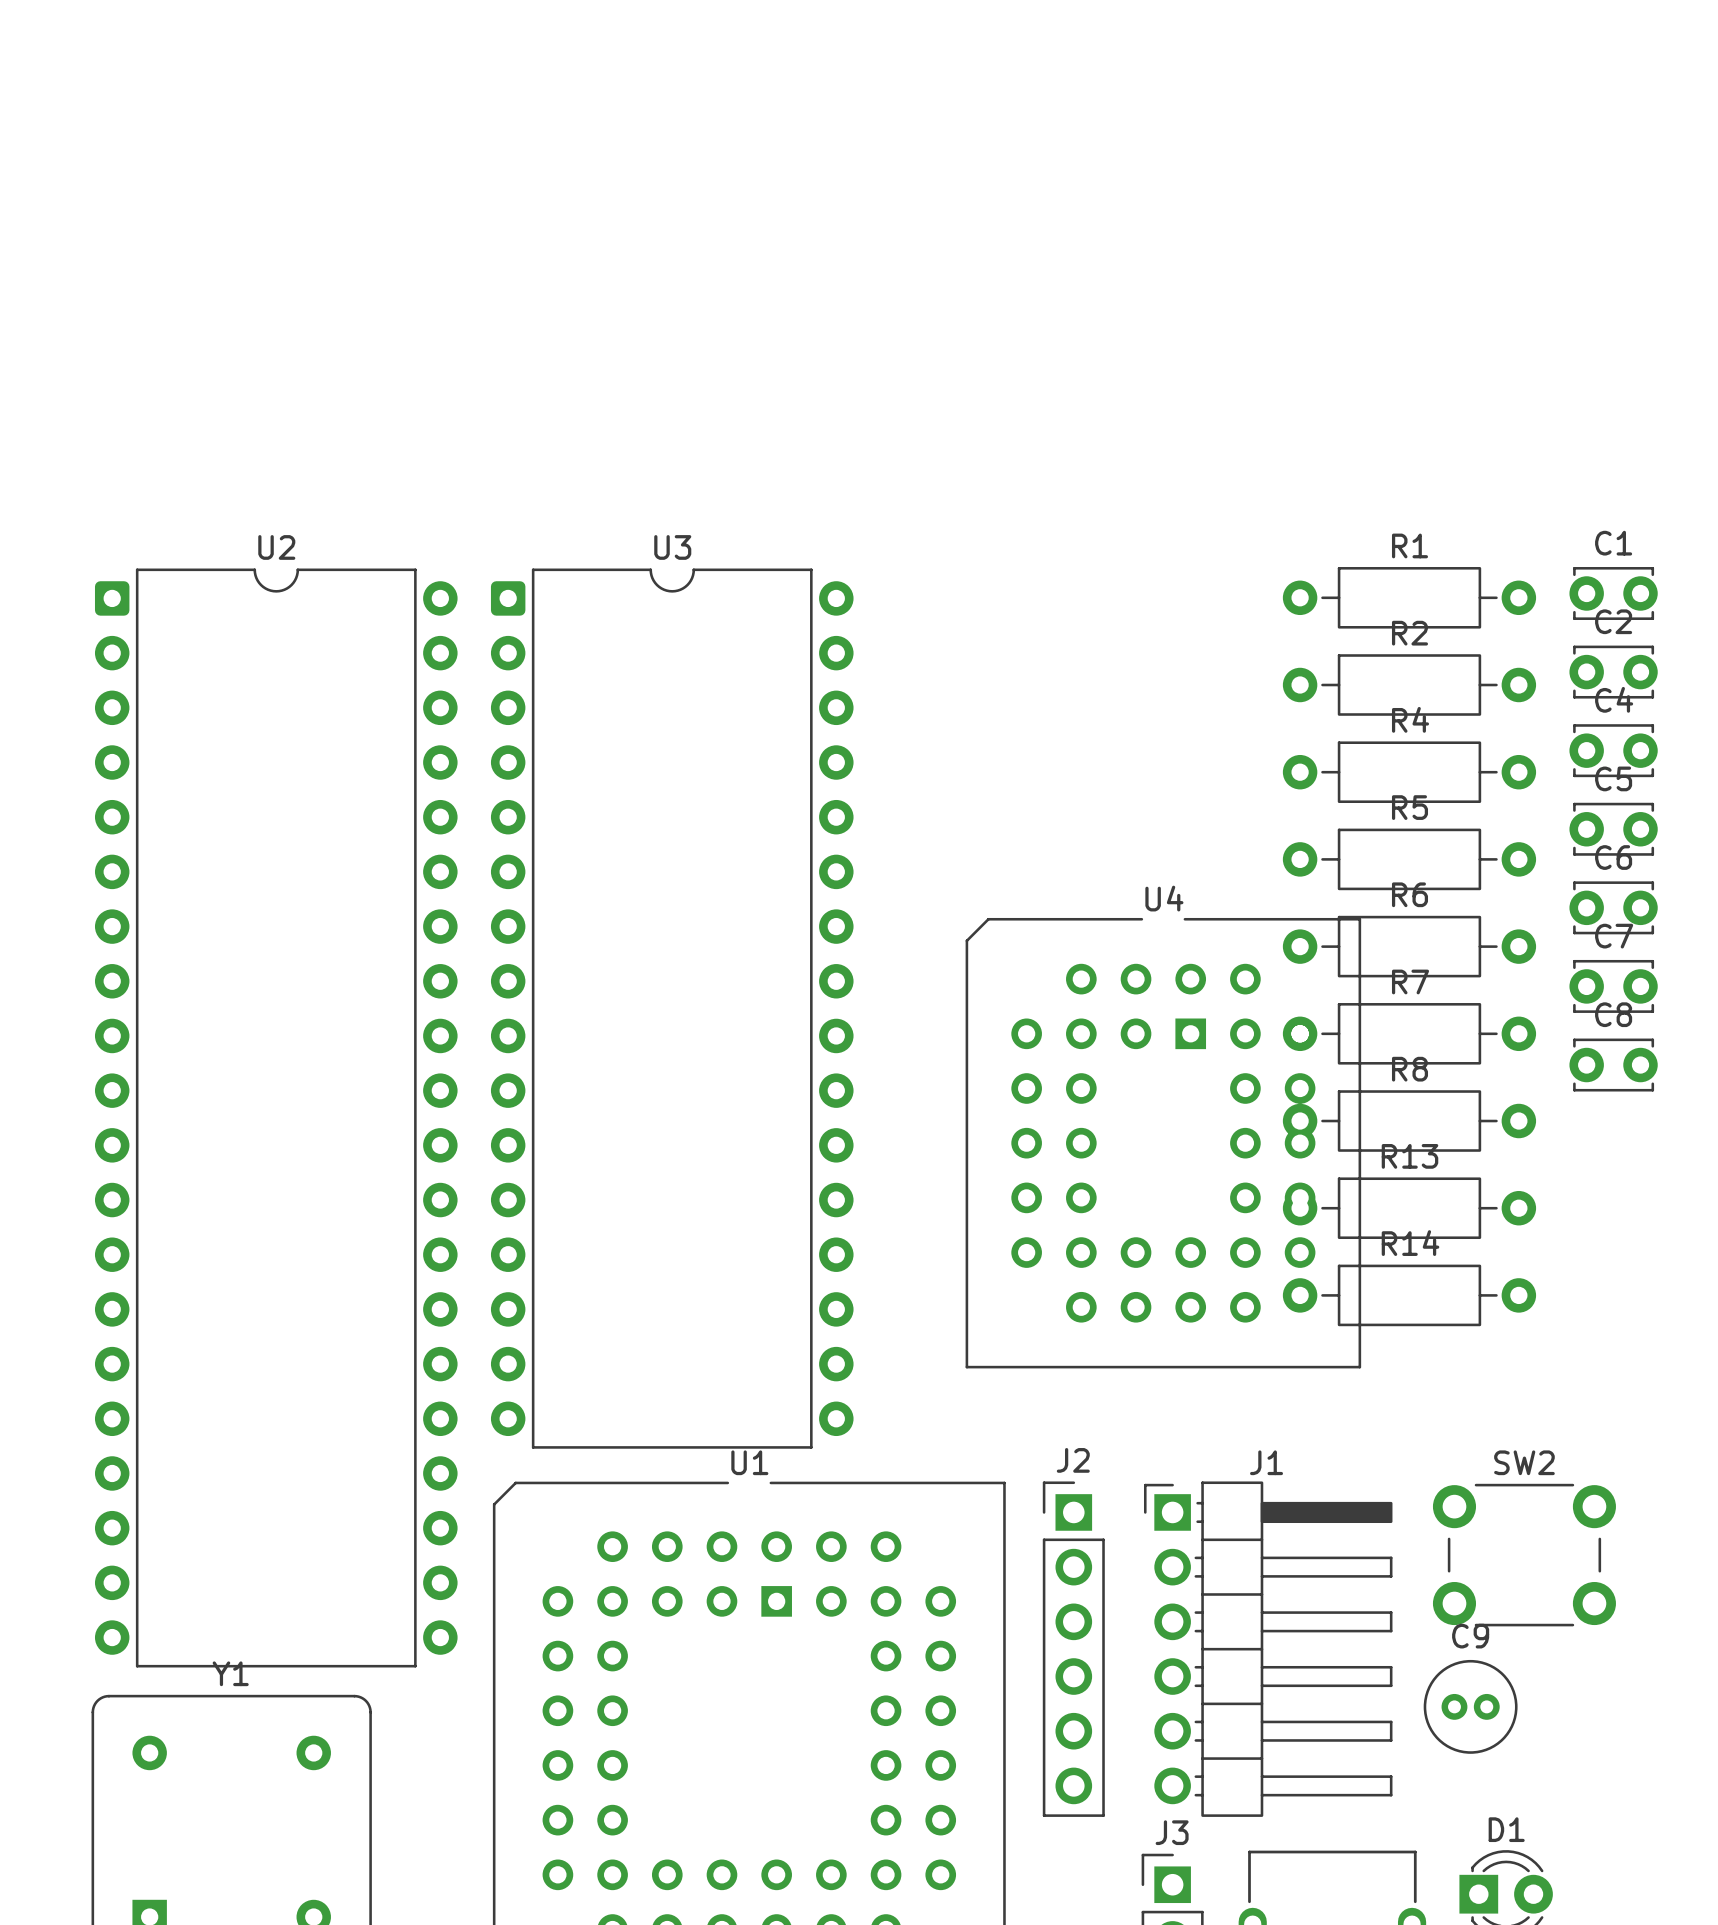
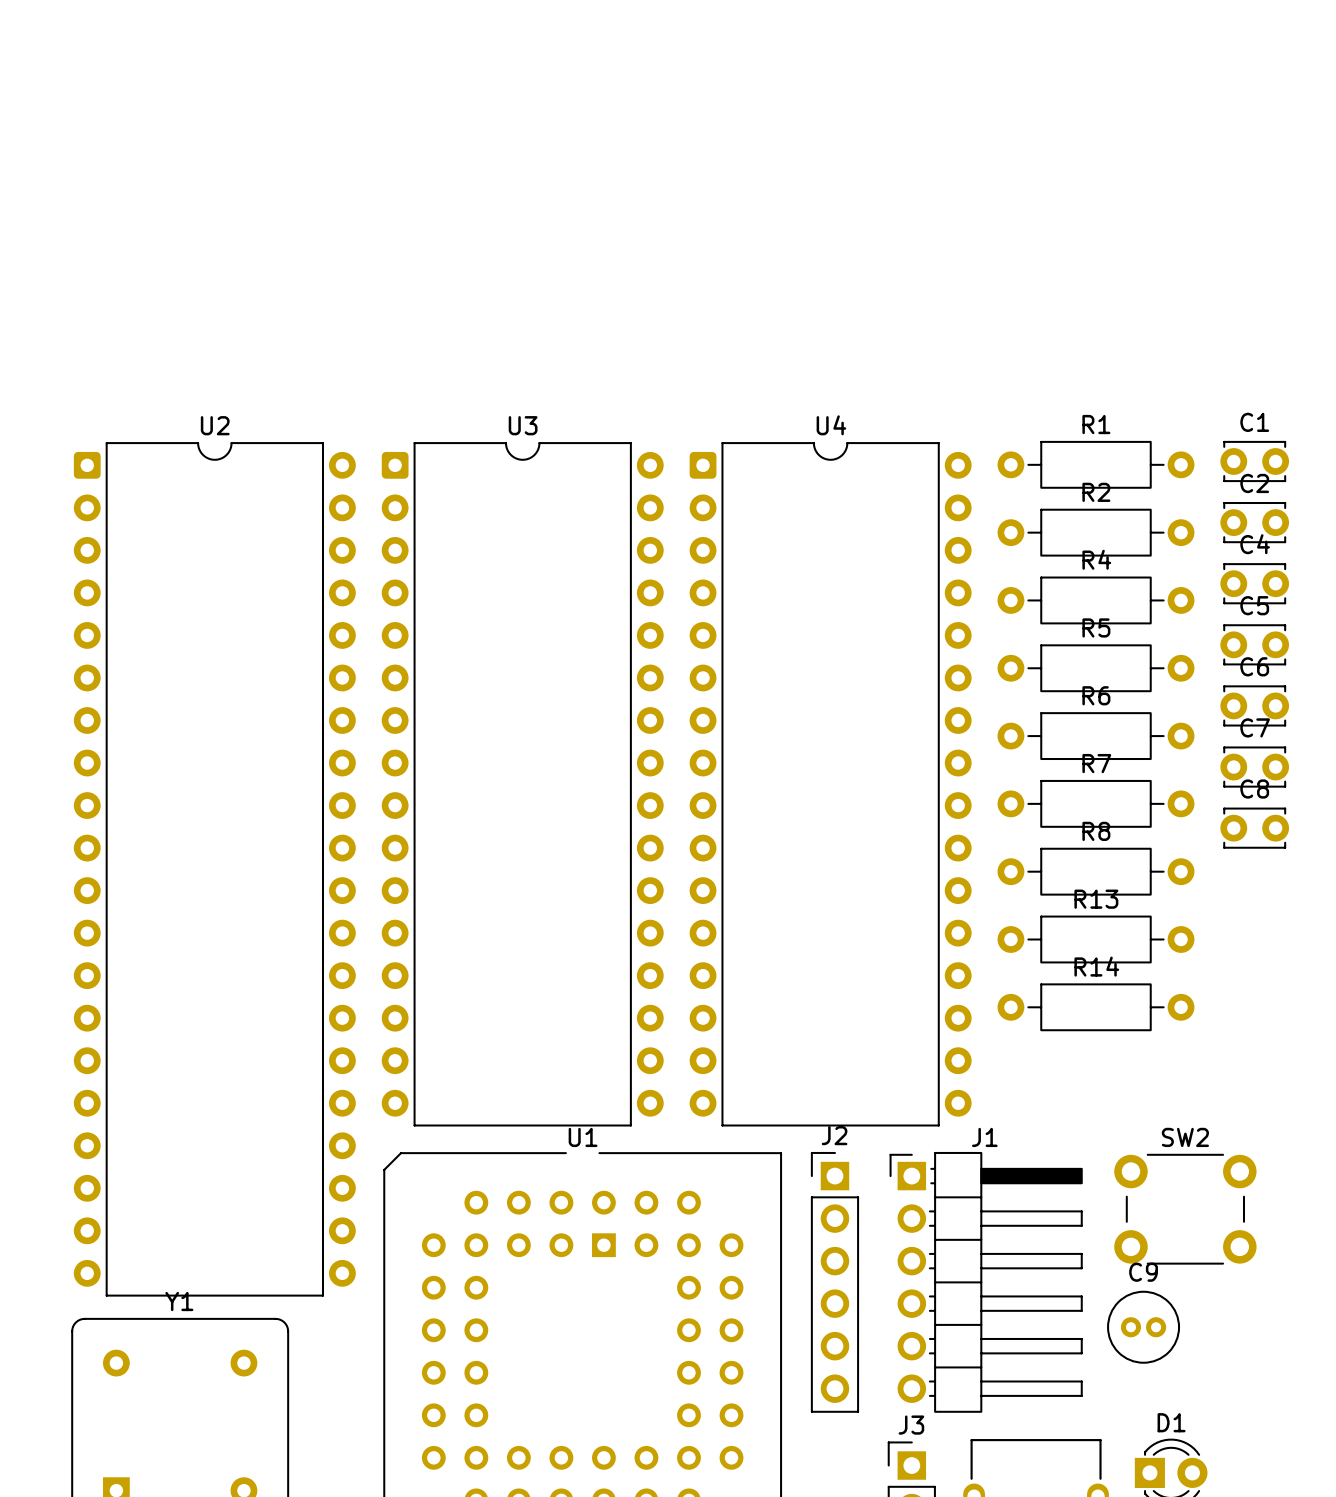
U4 name position: U4 (1164, 898) -> U4 (831, 425)
U4 footprint: [965, 917, 1362, 1369] -> [689, 442, 972, 1127]

